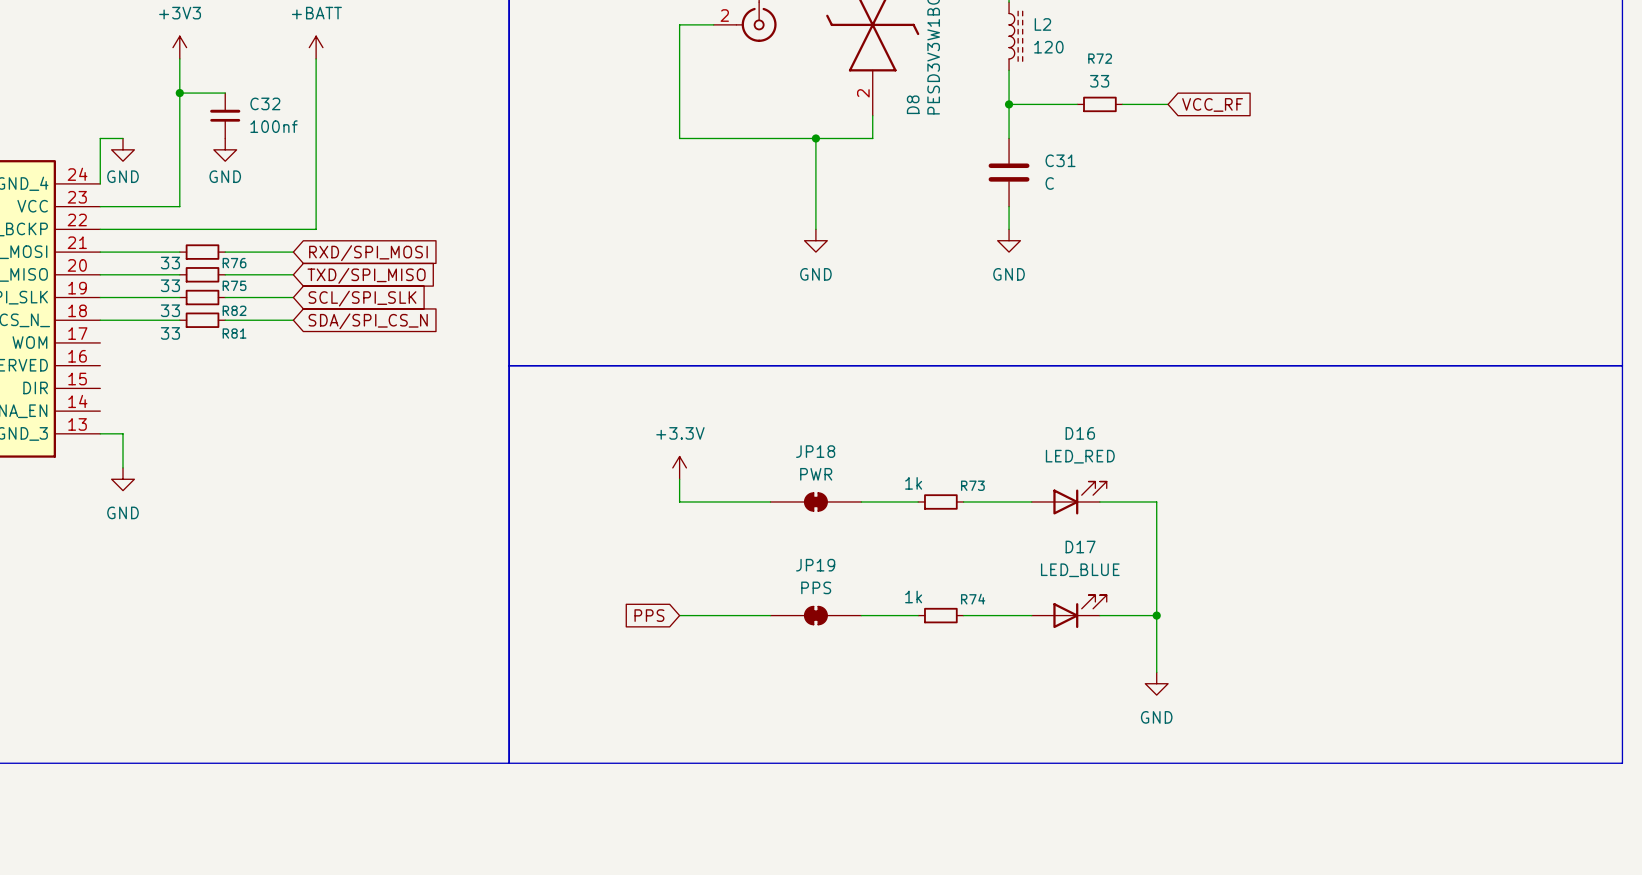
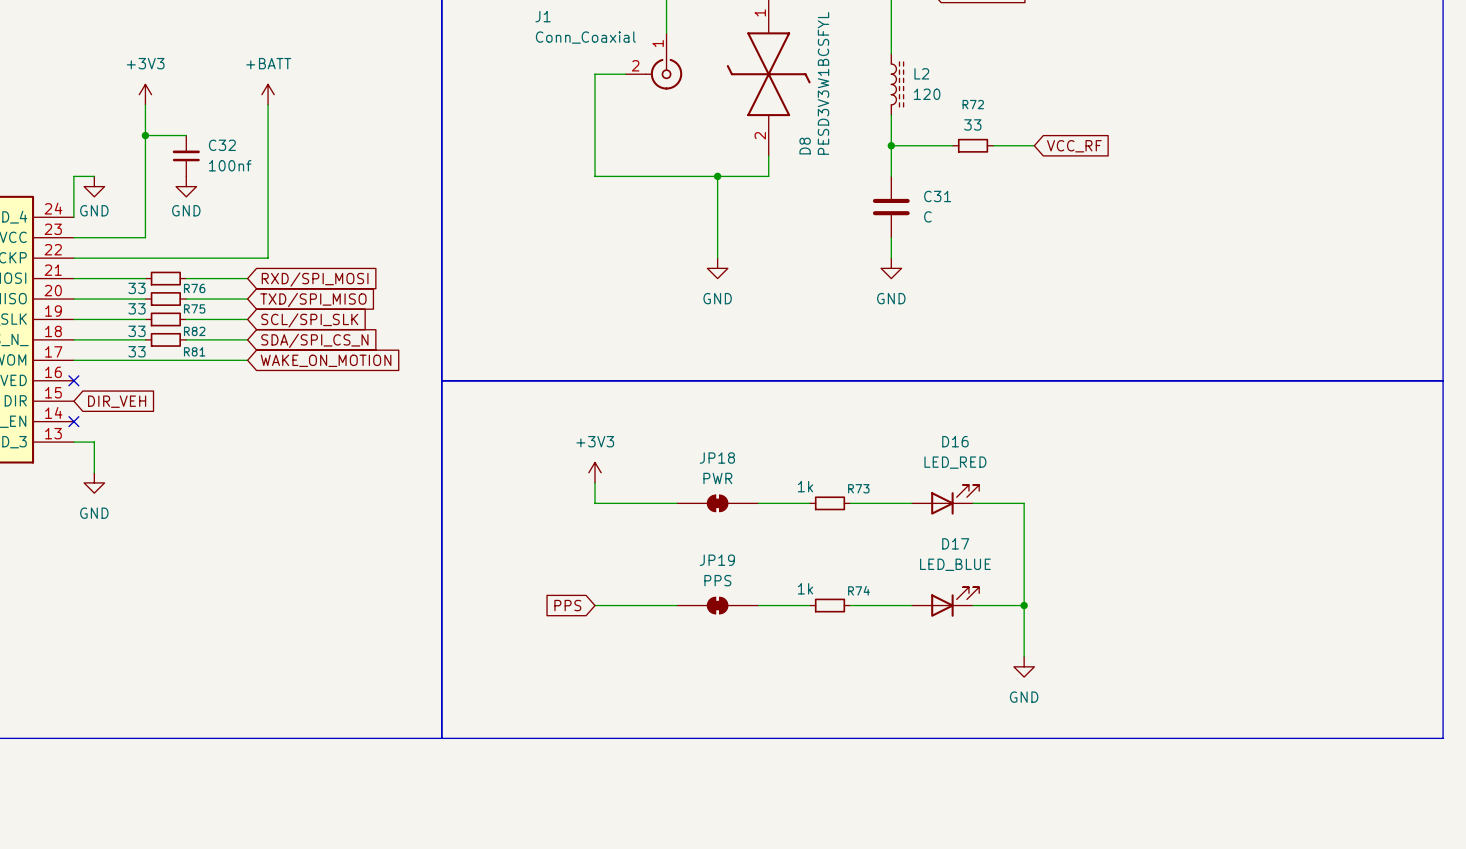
wire: none -> (73, 360) (247, 360)
global label: none -> WAKE_ON_MOTION (326, 360)
no-connect mark: none -> (73, 380)
global label: none -> DIR_VEH (117, 401)
no-connect mark: none -> (73, 421)
power symbol: +3.3V (679, 467) -> +3V3 (595, 472)

